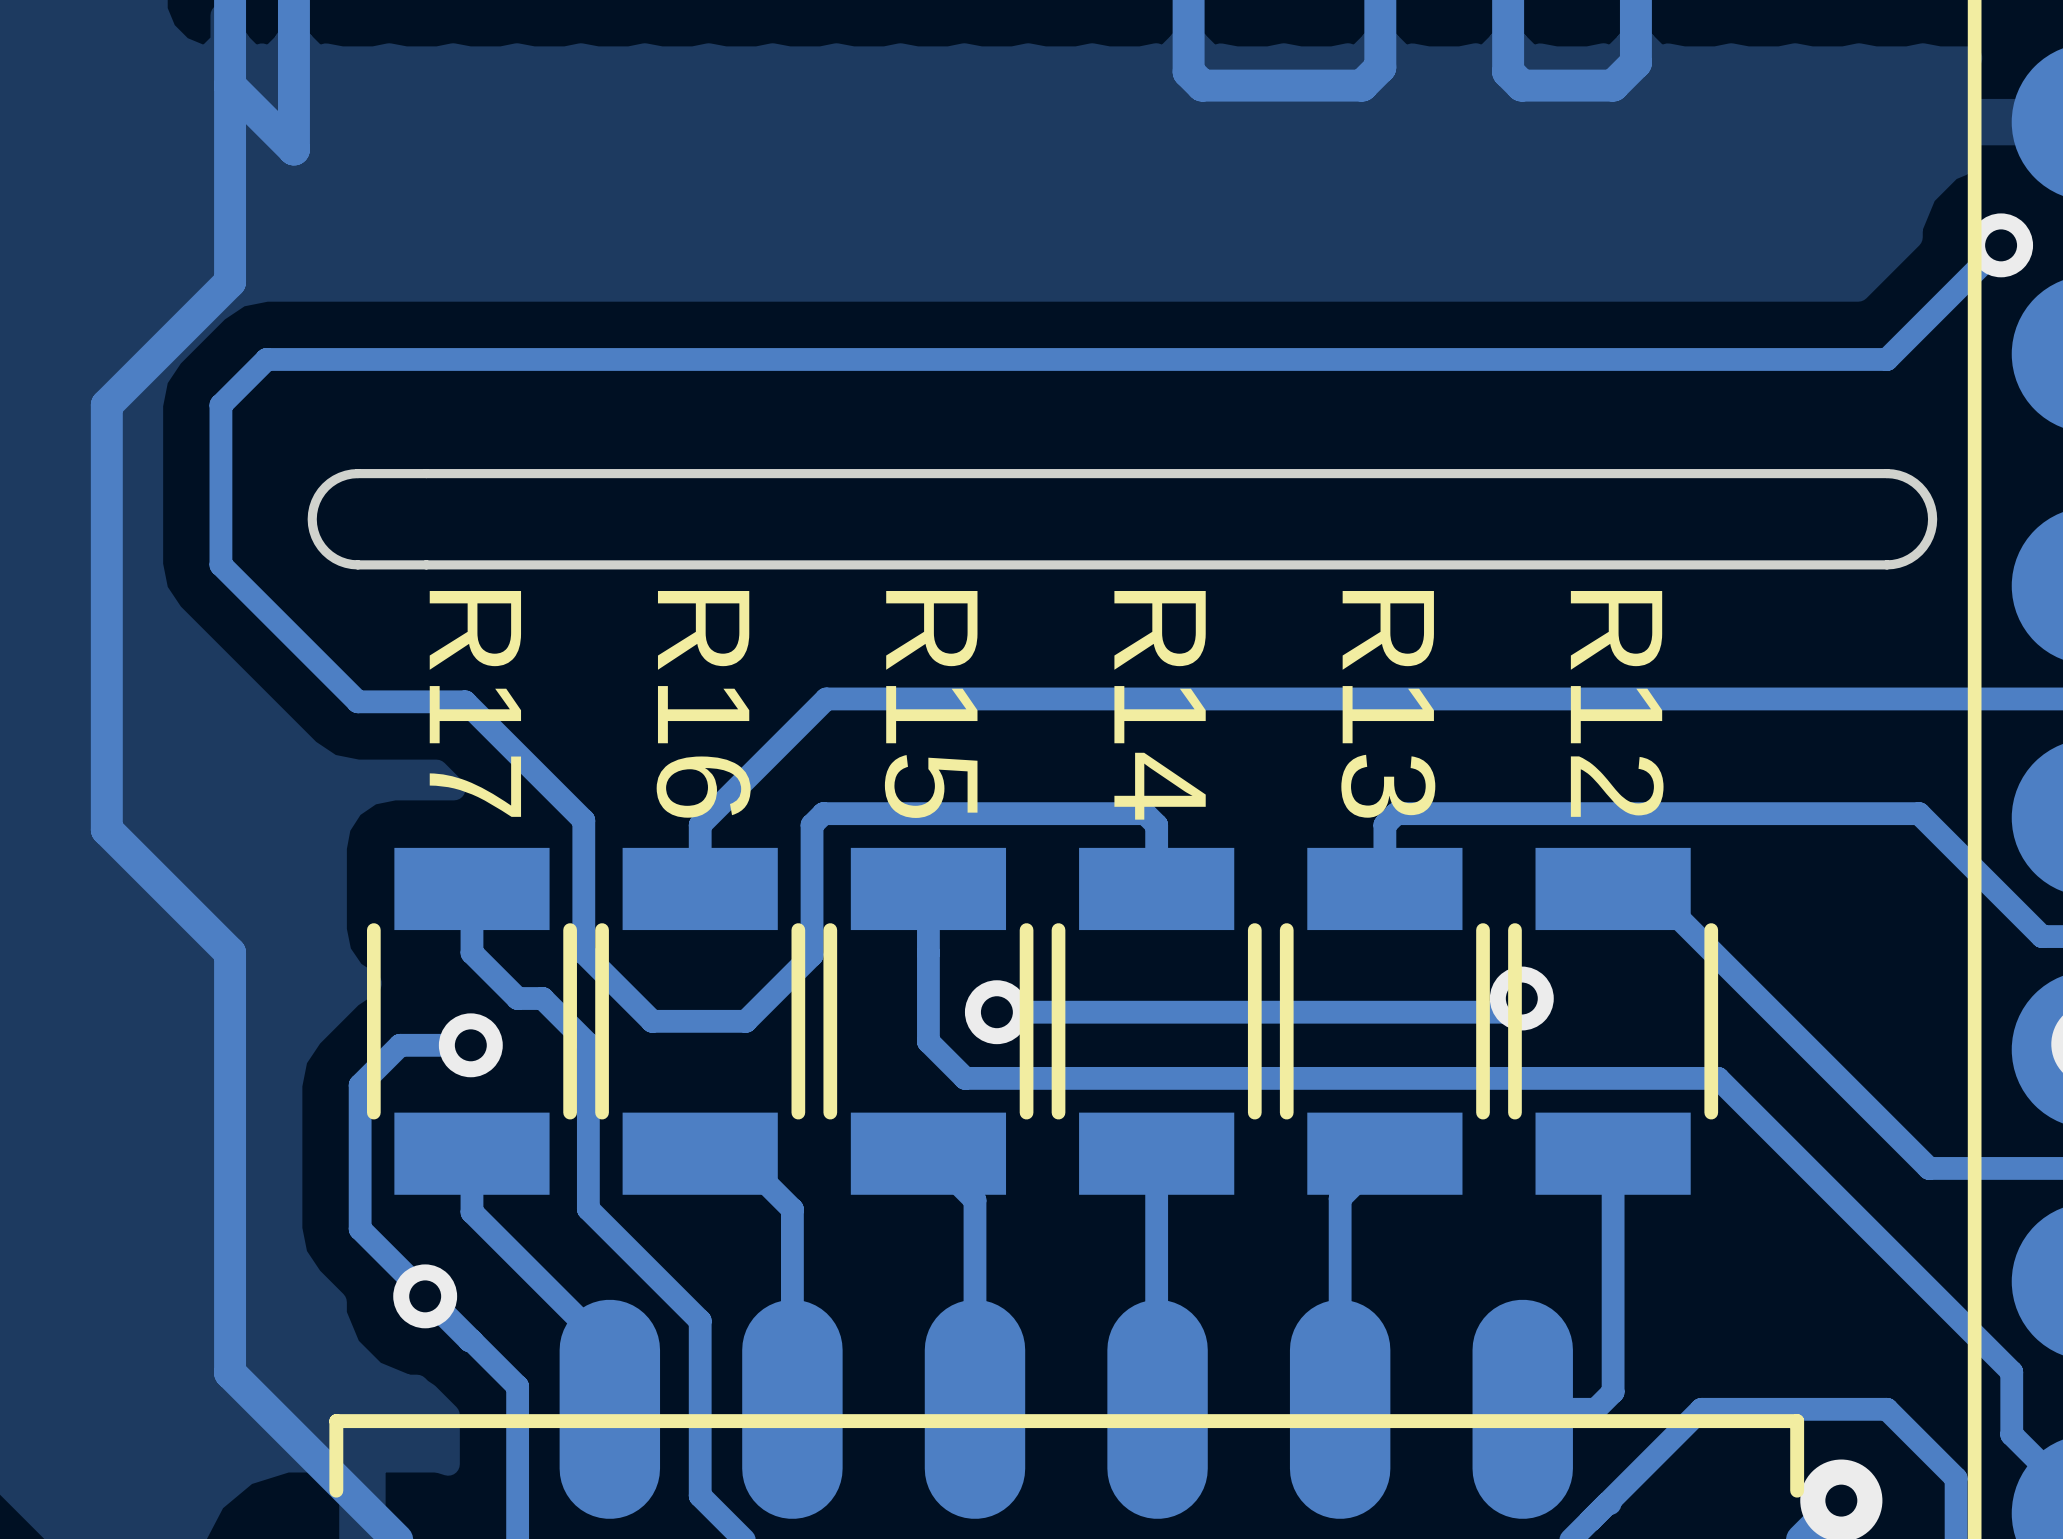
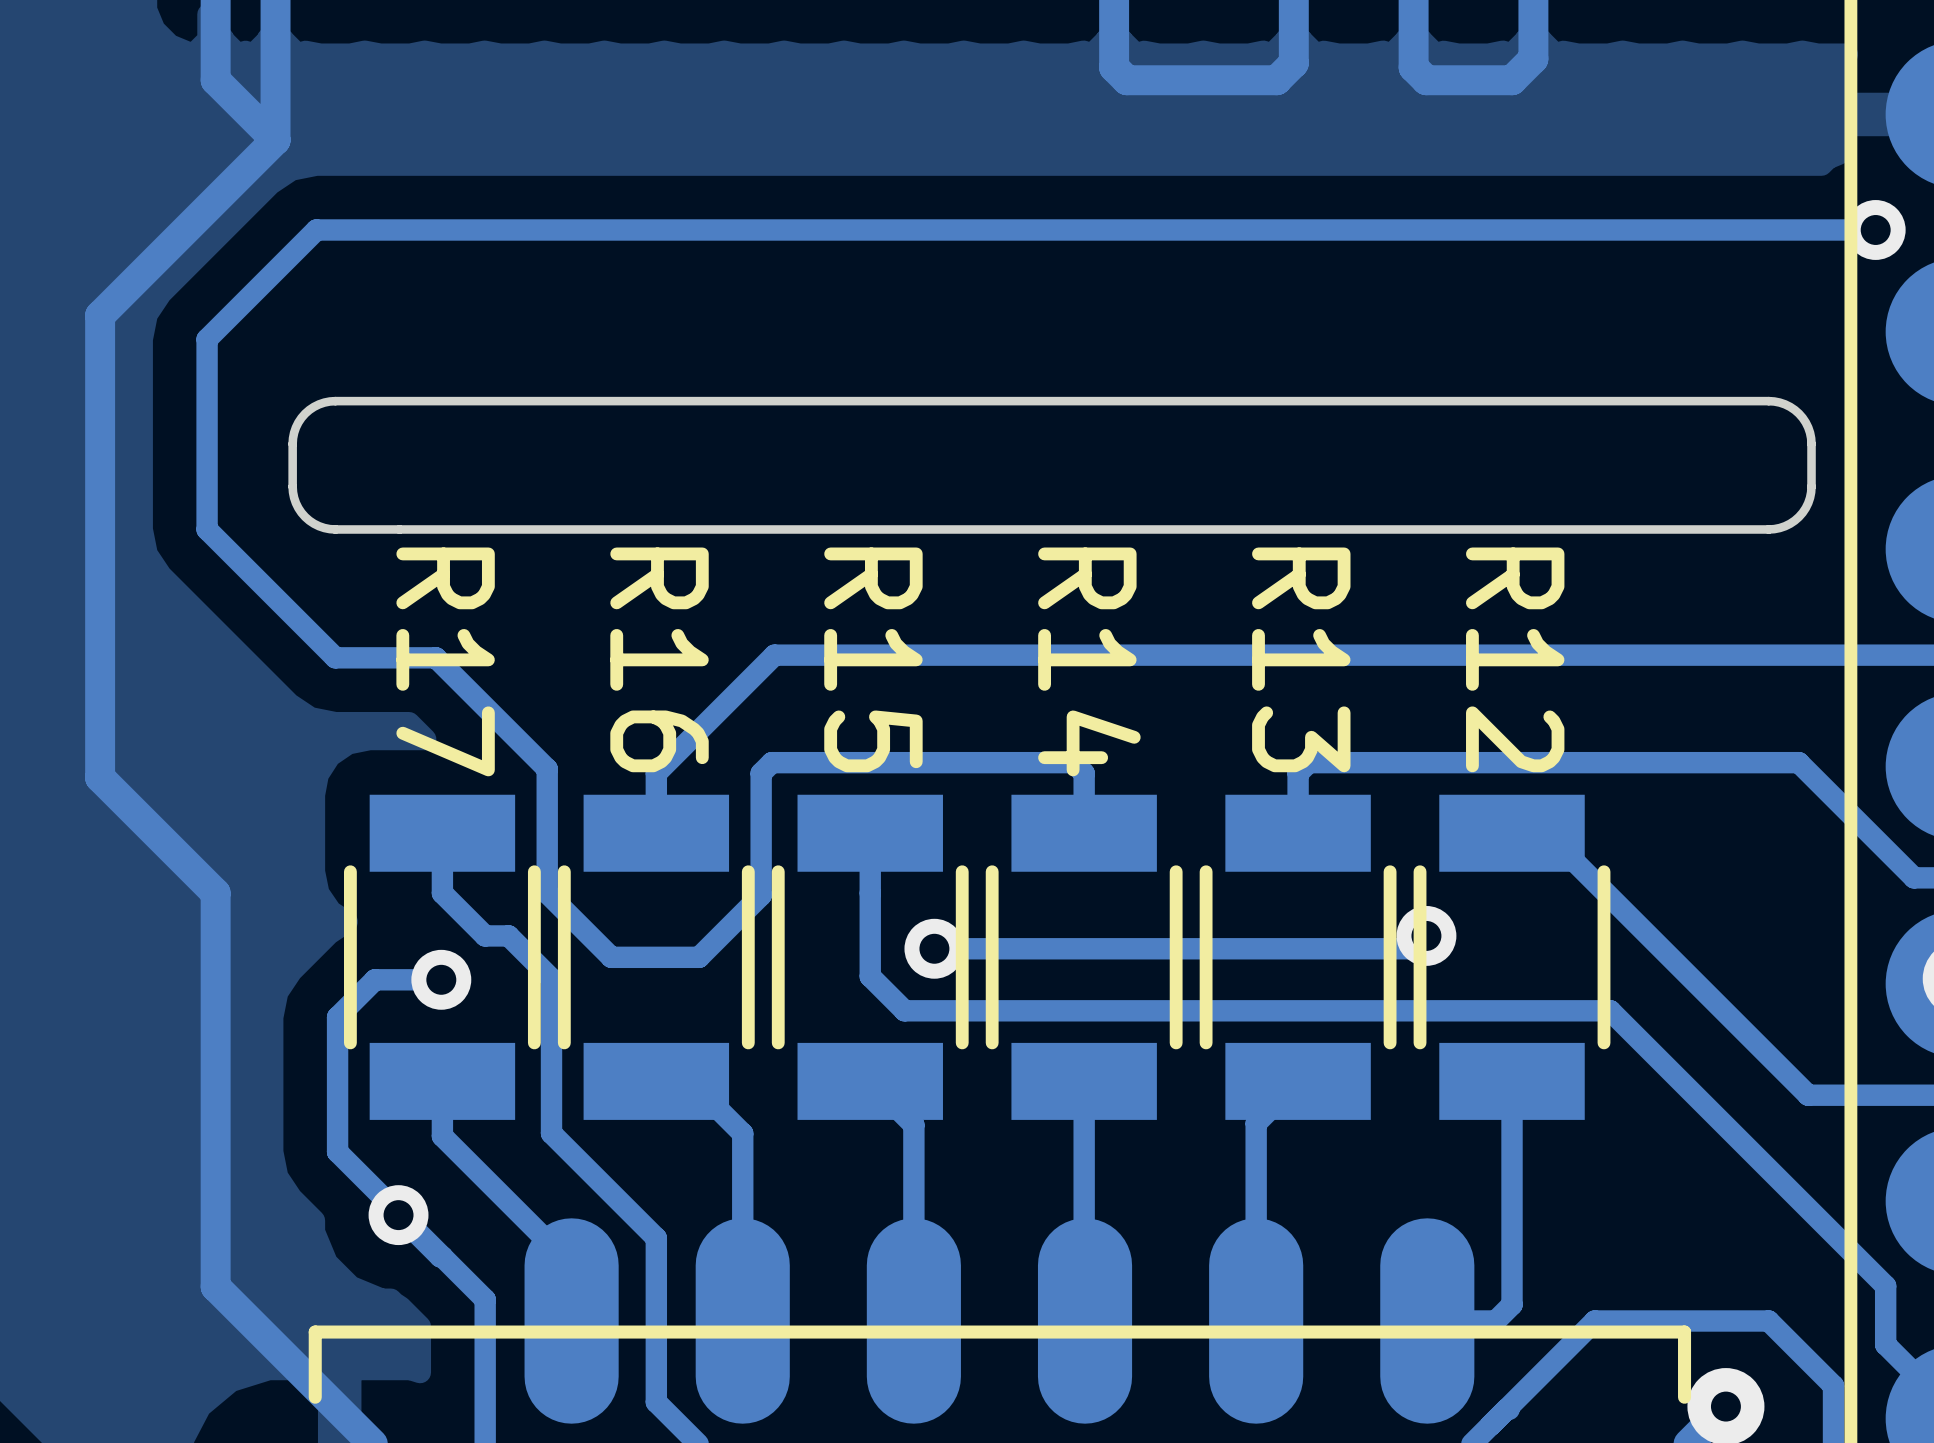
track: (230, 85) (230, 281) (106, 405) -> (275, 140) (100, 315) (100, 379)
track: (2001, 245) (1886, 359) (266, 359) (220, 405) -> (1875, 229) (316, 229) (207, 339) (207, 379)
board edge: (1886, 564) (1904, 561) (1919, 551) (1929, 536) (1932, 519) (1929, 501) (1919, 486) (1904, 477) (1886, 473) (357, 473) (340, 477) (325, 486) (315, 501) (312, 519) (315, 536) (325, 551) (340, 561) (357, 564) -> (1768, 529) (1785, 526) (1798, 516) (1808, 503) (1811, 486) (1811, 438) (1805, 422) (1790, 406) (1768, 401) (329, 401) (309, 409) (295, 427) (292, 443) (292, 486) (295, 503) (305, 516) (319, 526) (335, 529)

